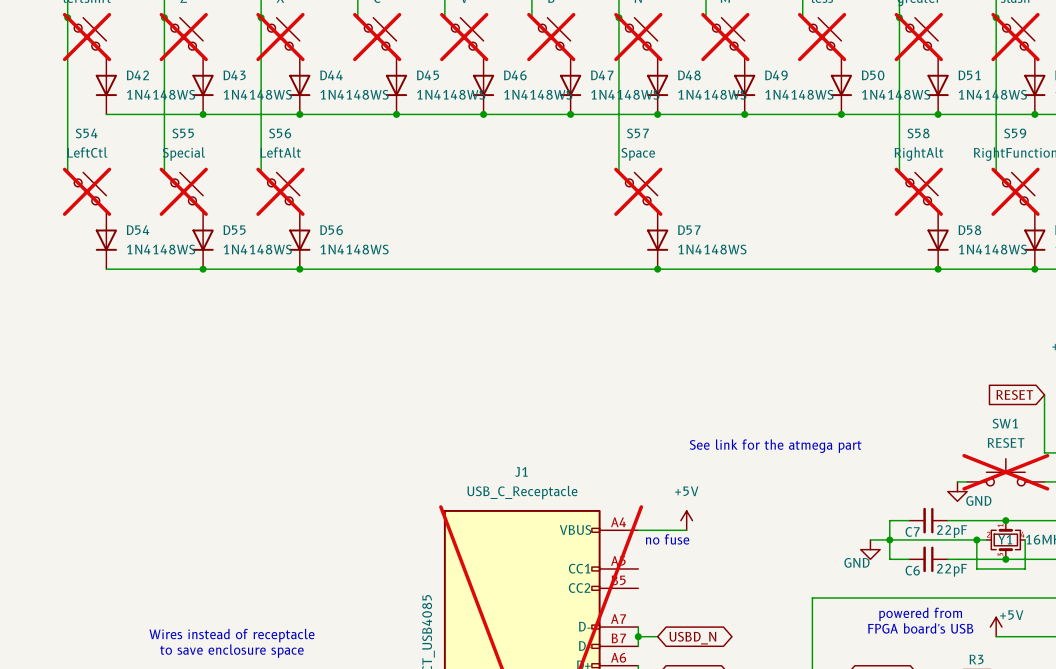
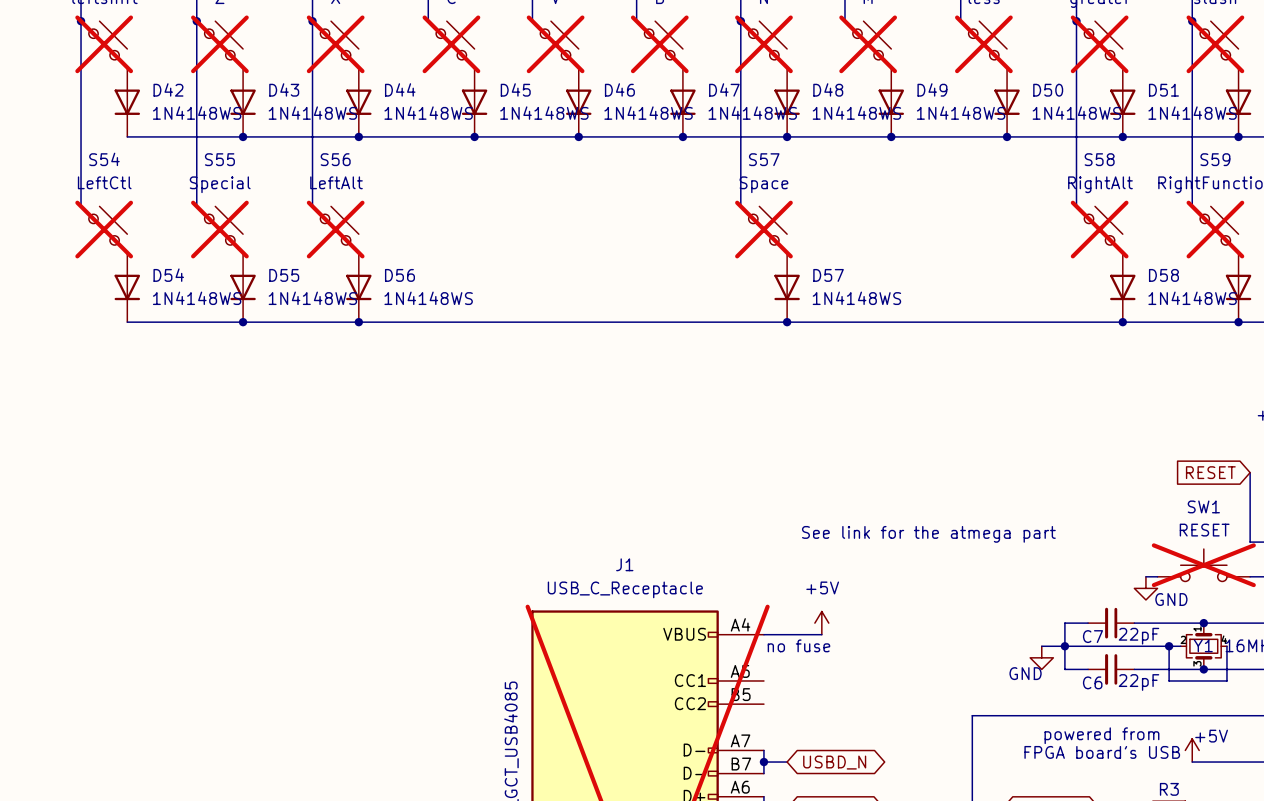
text: Wires instead of receptacle (231, 635) -> none
text: to save enclosure space (231, 651) -> none

